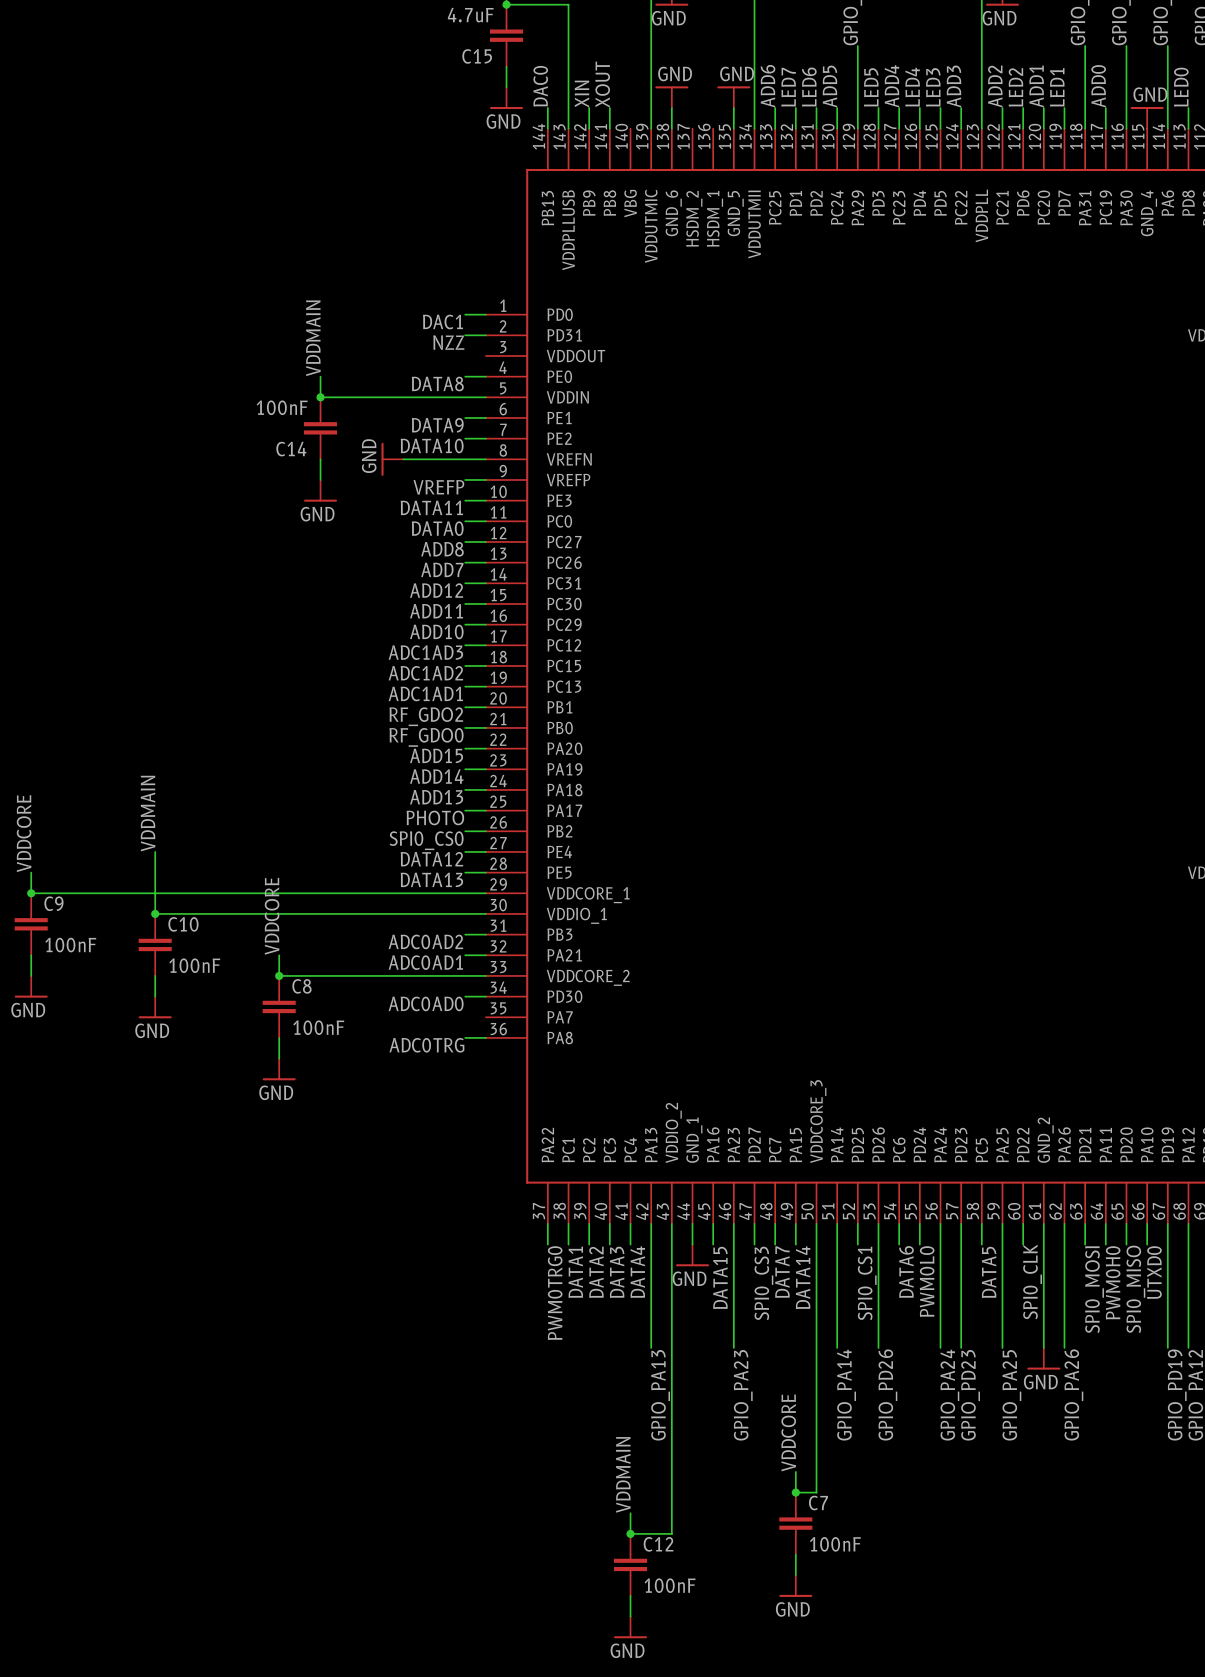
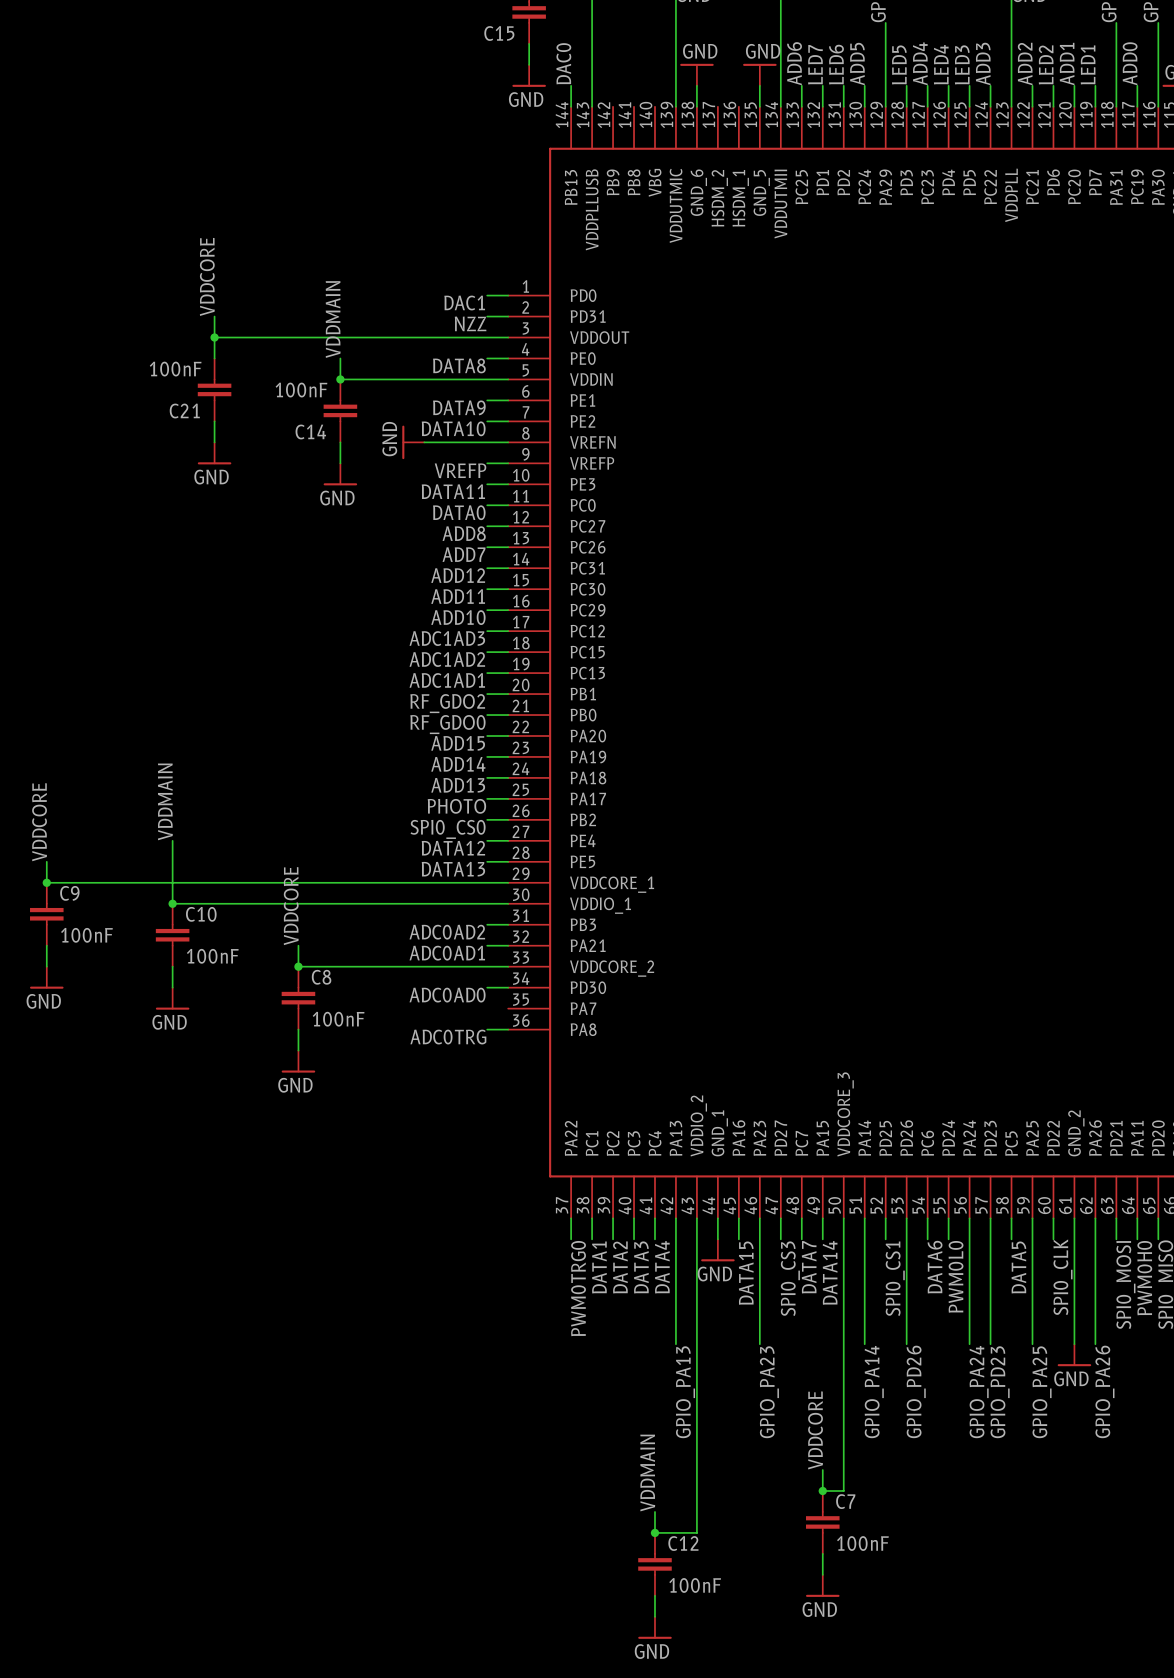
label: XOUT (602, 84) -> none
label: XIN (581, 94) -> none
wire: (589, 108) (589, 128) -> none
wire: (609, 108) (609, 128) -> none
label: none -> VDDCORE (207, 276)
wire: none -> (214, 316) (214, 358)
wire: none -> (214, 337) (508, 337)
junction: none -> (214, 337)
C21: none -> 100nF (214, 389)
wire: none -> (214, 421) (214, 442)
power symbol: none -> GND (214, 453)

